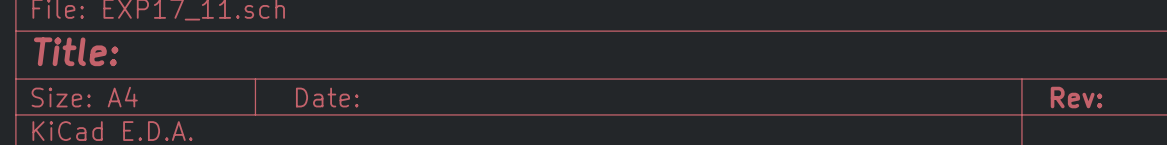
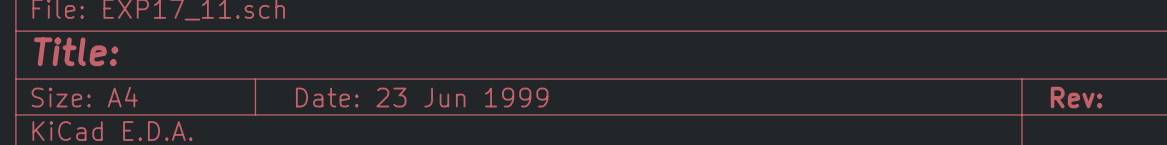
title block: Date: (327, 97) -> Date: 23 Jun 1999 (422, 97)

